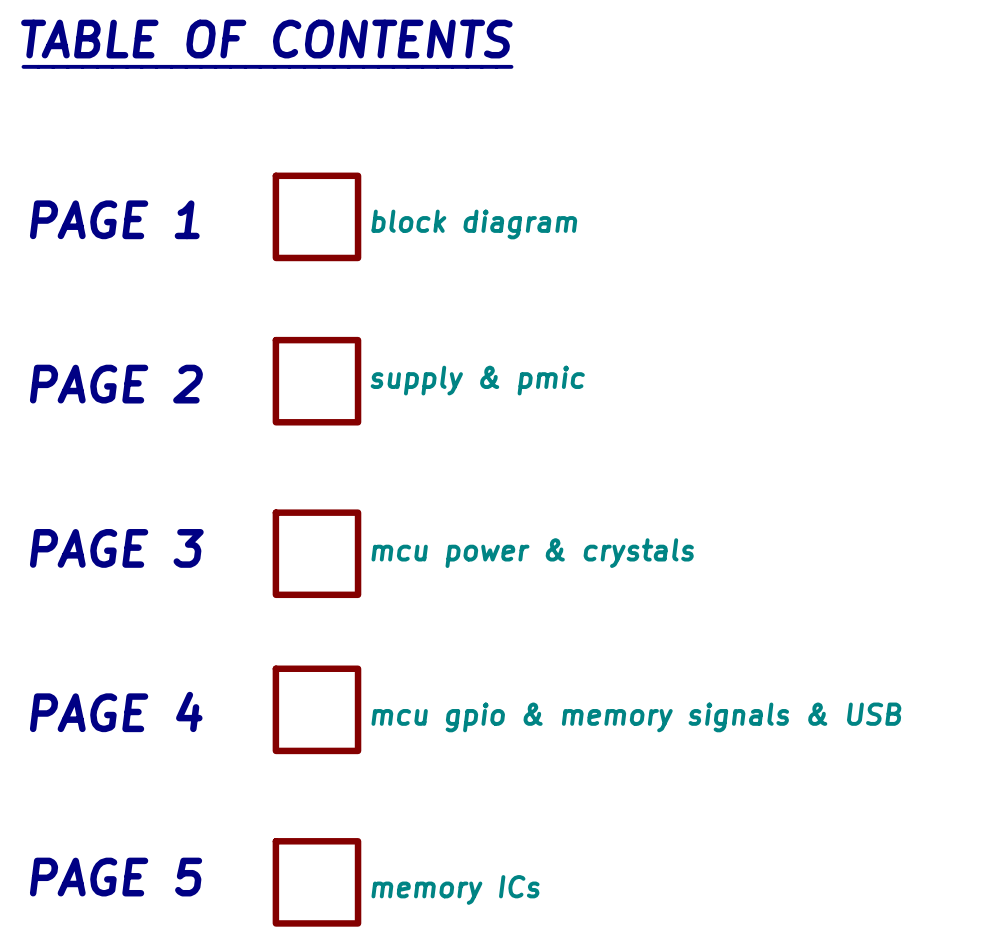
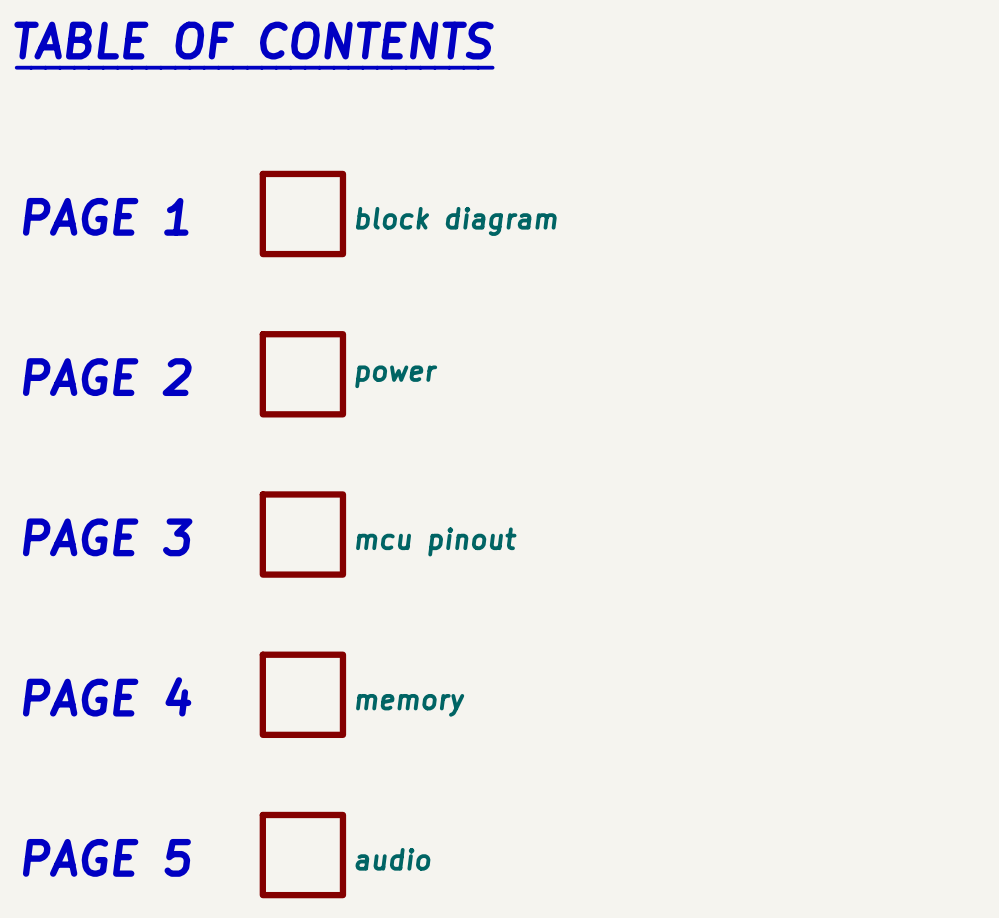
sheet supply & pmic name: supply & pmic (477, 380) -> power (396, 376)
sheet mcu pinout: none -> (302, 534)
sheet mcu power & crystals: (316, 553) -> none
sheet mcu gpio & memory signals & USB name: mcu gpio & memory signals & USB (636, 717) -> memory (410, 705)
sheet audio: none -> (302, 855)
sheet memory ICs: (316, 882) -> none

